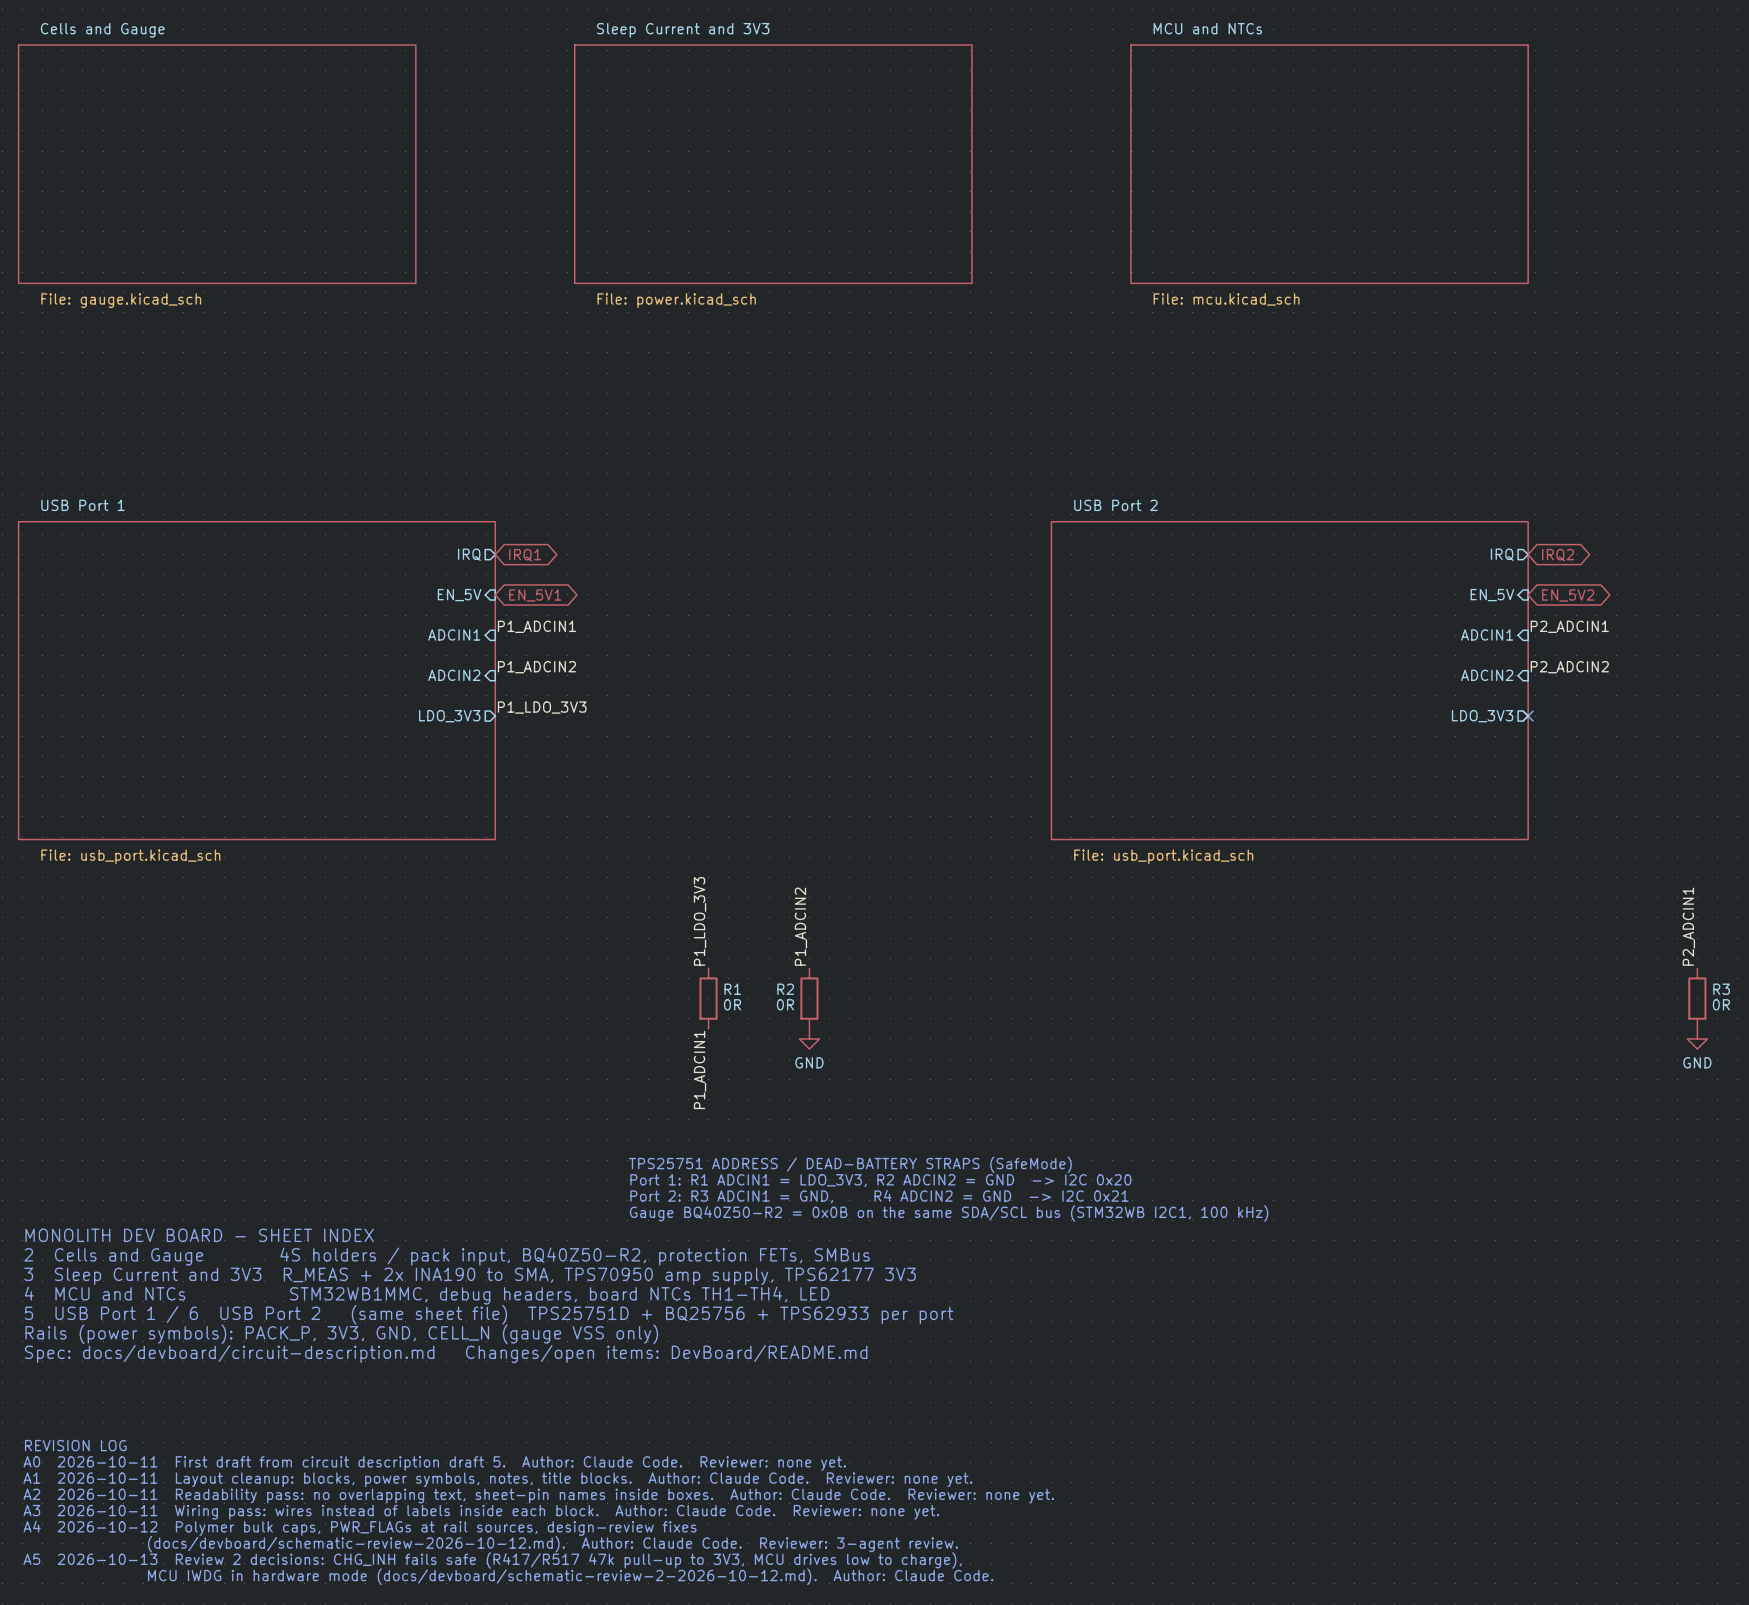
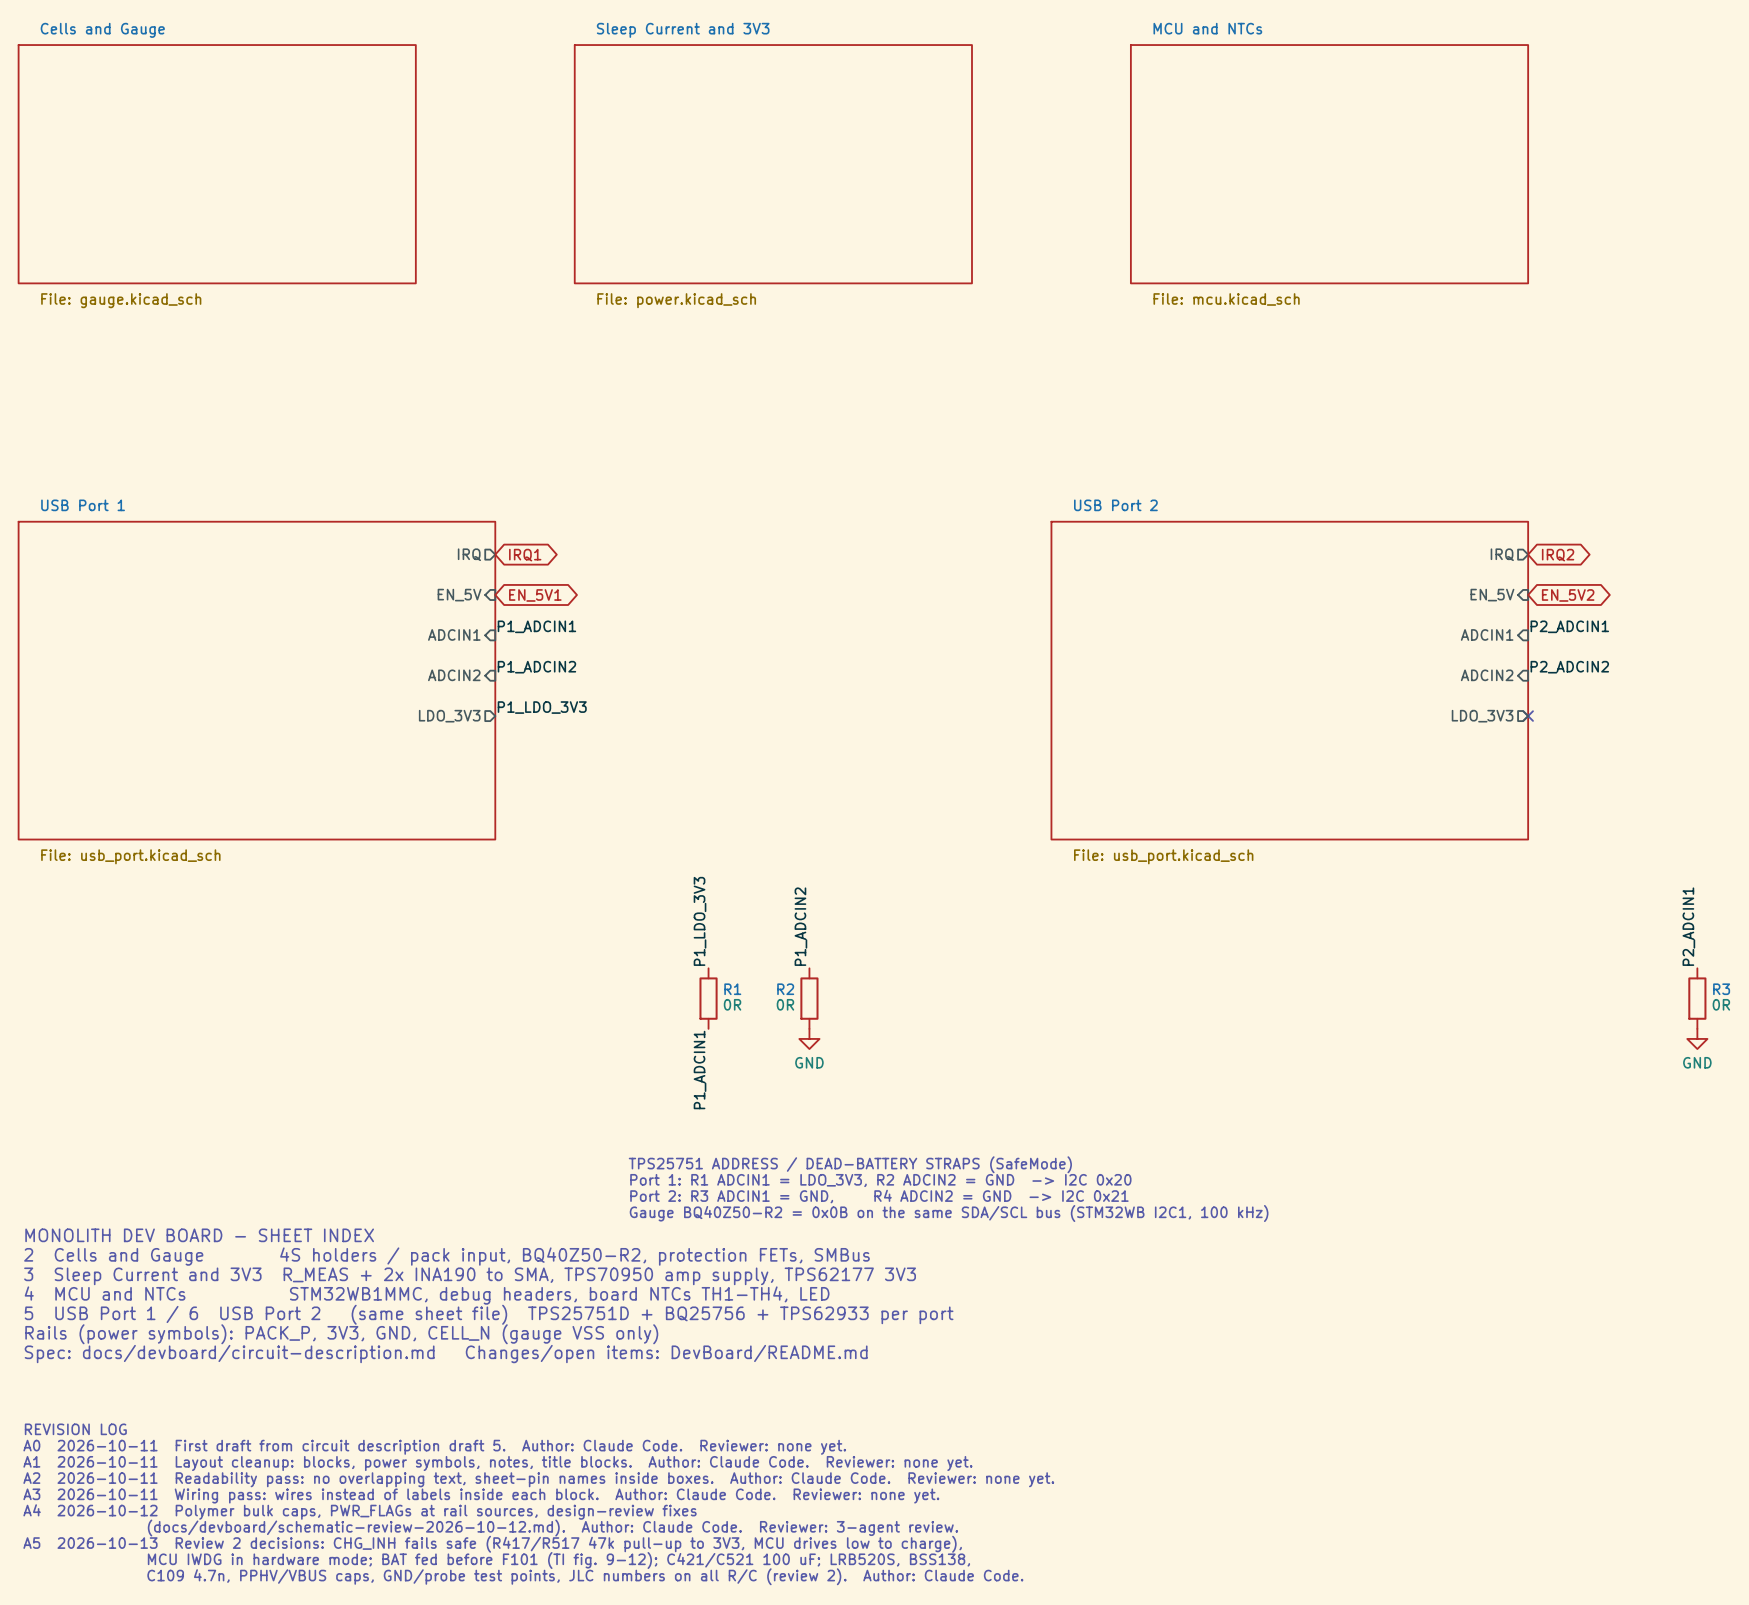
text: none -> REVISION LOG (75, 1429)
text: REVISION LOG (75, 1445) -> A0 2026-10-11 First draft from circuit description draft 5. Author: Claude Code. Reviewer: none yet. (434, 1447)
text: A0 2026-10-11 First draft from circuit description draft 5. Author: Claude Code. Reviewer: none yet. (434, 1463) -> A1 2026-10-11 Layout cleanup: blocks, power symbols, notes, title blocks. Author: Claude Code. Reviewer: none yet. (497, 1463)
text: A1 2026-10-11 Layout cleanup: blocks, power symbols, notes, title blocks. Author: Claude Code. Reviewer: none yet. (497, 1479) -> A2 2026-10-11 Readability pass: no overlapping text, sheet-pin names inside boxes. Author: Claude Code. Reviewer: none yet. (538, 1479)
text: A2 2026-10-11 Readability pass: no overlapping text, sheet-pin names inside boxes. Author: Claude Code. Reviewer: none yet. (538, 1496) -> A3 2026-10-11 Wiring pass: wires instead of labels inside each block. Author: Claude Code. Reviewer: none yet. (481, 1496)
text: A3 2026-10-11 Wiring pass: wires instead of labels inside each block. Author: Claude Code. Reviewer: none yet. (481, 1512) -> A4 2026-10-12 Polymer bulk caps, PWR_FLAGs at rail sources, design-review fixes (360, 1512)
text: A4 2026-10-12 Polymer bulk caps, PWR_FLAGs at rail sources, design-review fixes (360, 1528) -> (docs/devboard/schematic-review-2026-10-12.md). Author: Claude Code. Reviewer: 3-agent review. (552, 1528)
text: (docs/devboard/schematic-review-2026-10-12.md). Author: Claude Code. Reviewer: 3-agent review. (552, 1544) -> A5 2026-10-13 Review 2 decisions: CHG_INH fails safe (R417/R517 47k pull-up to 3V3, MCU drives low to charge), (492, 1544)
text: A5 2026-10-13 Review 2 decisions: CHG_INH fails safe (R417/R517 47k pull-up to 3V3, MCU drives low to charge), (492, 1560) -> MCU IWDG in hardware mode; BAT fed before F101 (TI fig. 9-12); C421/C521 100 uF; LRB520S, BSS138, (558, 1560)
text: MCU IWDG in hardware mode (docs/devboard/schematic-review-2-2026-10-12.md). Author: Claude Code. (570, 1576) -> C109 4.7n, PPHV/VBUS caps, GND/probe test points, JLC numbers on all R/C (review 2). Author: Claude Code. (585, 1576)

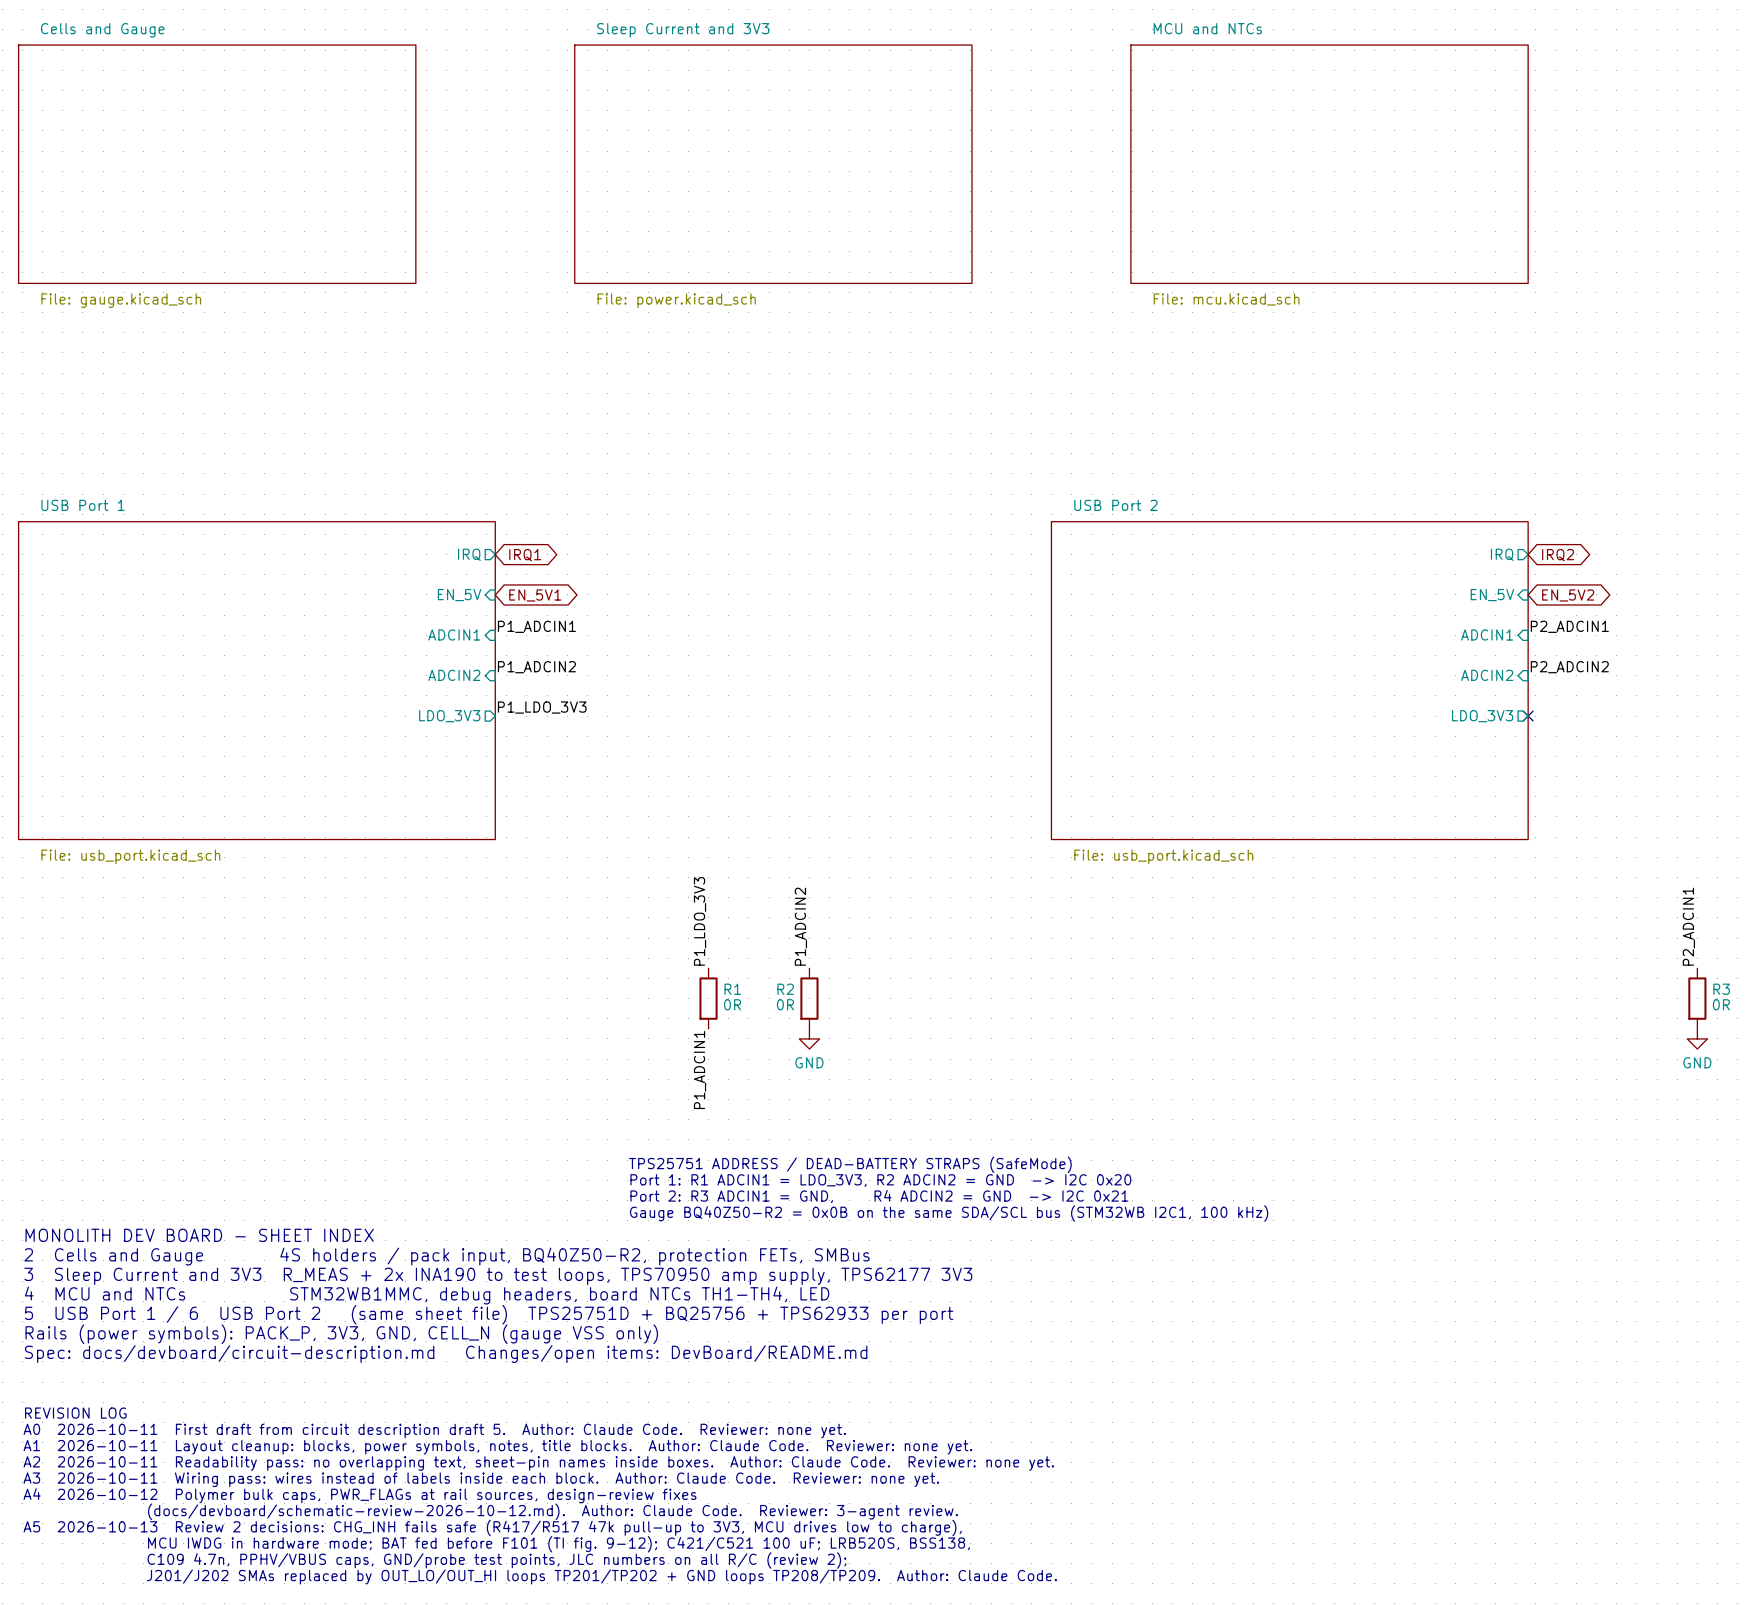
text: 3 Sleep Current and 3V3 R_MEAS + 2x INA190 to SMA, TPS70950 amp supply, TPS62177 3V3 (470, 1276) -> 3 Sleep Current and 3V3 R_MEAS + 2x INA190 to test loops, TPS70950 amp supply, TPS62177 3V3 (498, 1276)
text: none -> REVISION LOG (75, 1413)
text: REVISION LOG (75, 1429) -> A0 2026-10-11 First draft from circuit description draft 5. Author: Claude Code. Reviewer: none yet. (434, 1431)
text: A0 2026-10-11 First draft from circuit description draft 5. Author: Claude Code. Reviewer: none yet. (434, 1447) -> A1 2026-10-11 Layout cleanup: blocks, power symbols, notes, title blocks. Author: Claude Code. Reviewer: none yet. (497, 1447)
text: A1 2026-10-11 Layout cleanup: blocks, power symbols, notes, title blocks. Author: Claude Code. Reviewer: none yet. (497, 1463) -> A2 2026-10-11 Readability pass: no overlapping text, sheet-pin names inside boxes. Author: Claude Code. Reviewer: none yet. (538, 1463)
text: A2 2026-10-11 Readability pass: no overlapping text, sheet-pin names inside boxes. Author: Claude Code. Reviewer: none yet. (538, 1479) -> A3 2026-10-11 Wiring pass: wires instead of labels inside each block. Author: Claude Code. Reviewer: none yet. (481, 1479)
text: A3 2026-10-11 Wiring pass: wires instead of labels inside each block. Author: Claude Code. Reviewer: none yet. (481, 1496) -> A4 2026-10-12 Polymer bulk caps, PWR_FLAGs at rail sources, design-review fixes (360, 1495)
text: A4 2026-10-12 Polymer bulk caps, PWR_FLAGs at rail sources, design-review fixes (360, 1512) -> (docs/devboard/schematic-review-2026-10-12.md). Author: Claude Code. Reviewer: 3-agent review. (552, 1511)
text: (docs/devboard/schematic-review-2026-10-12.md). Author: Claude Code. Reviewer: 3-agent review. (552, 1528) -> A5 2026-10-13 Review 2 decisions: CHG_INH fails safe (R417/R517 47k pull-up to 3V3, MCU drives low to charge), (492, 1528)
text: A5 2026-10-13 Review 2 decisions: CHG_INH fails safe (R417/R517 47k pull-up to 3V3, MCU drives low to charge), (492, 1544) -> MCU IWDG in hardware mode; BAT fed before F101 (TI fig. 9-12); C421/C521 100 uF; LRB520S, BSS138, (558, 1544)
text: MCU IWDG in hardware mode; BAT fed before F101 (TI fig. 9-12); C421/C521 100 uF; LRB520S, BSS138, (558, 1560) -> C109 4.7n, PPHV/VBUS caps, GND/probe test points, JLC numbers on all R/C (review 2); (496, 1560)
text: C109 4.7n, PPHV/VBUS caps, GND/probe test points, JLC numbers on all R/C (review 2). Author: Claude Code. (585, 1576) -> J201/J202 SMAs replaced by OUT_LO/OUT_HI loops TP201/TP202 + GND loops TP208/TP209. Author: Claude Code. (601, 1576)

